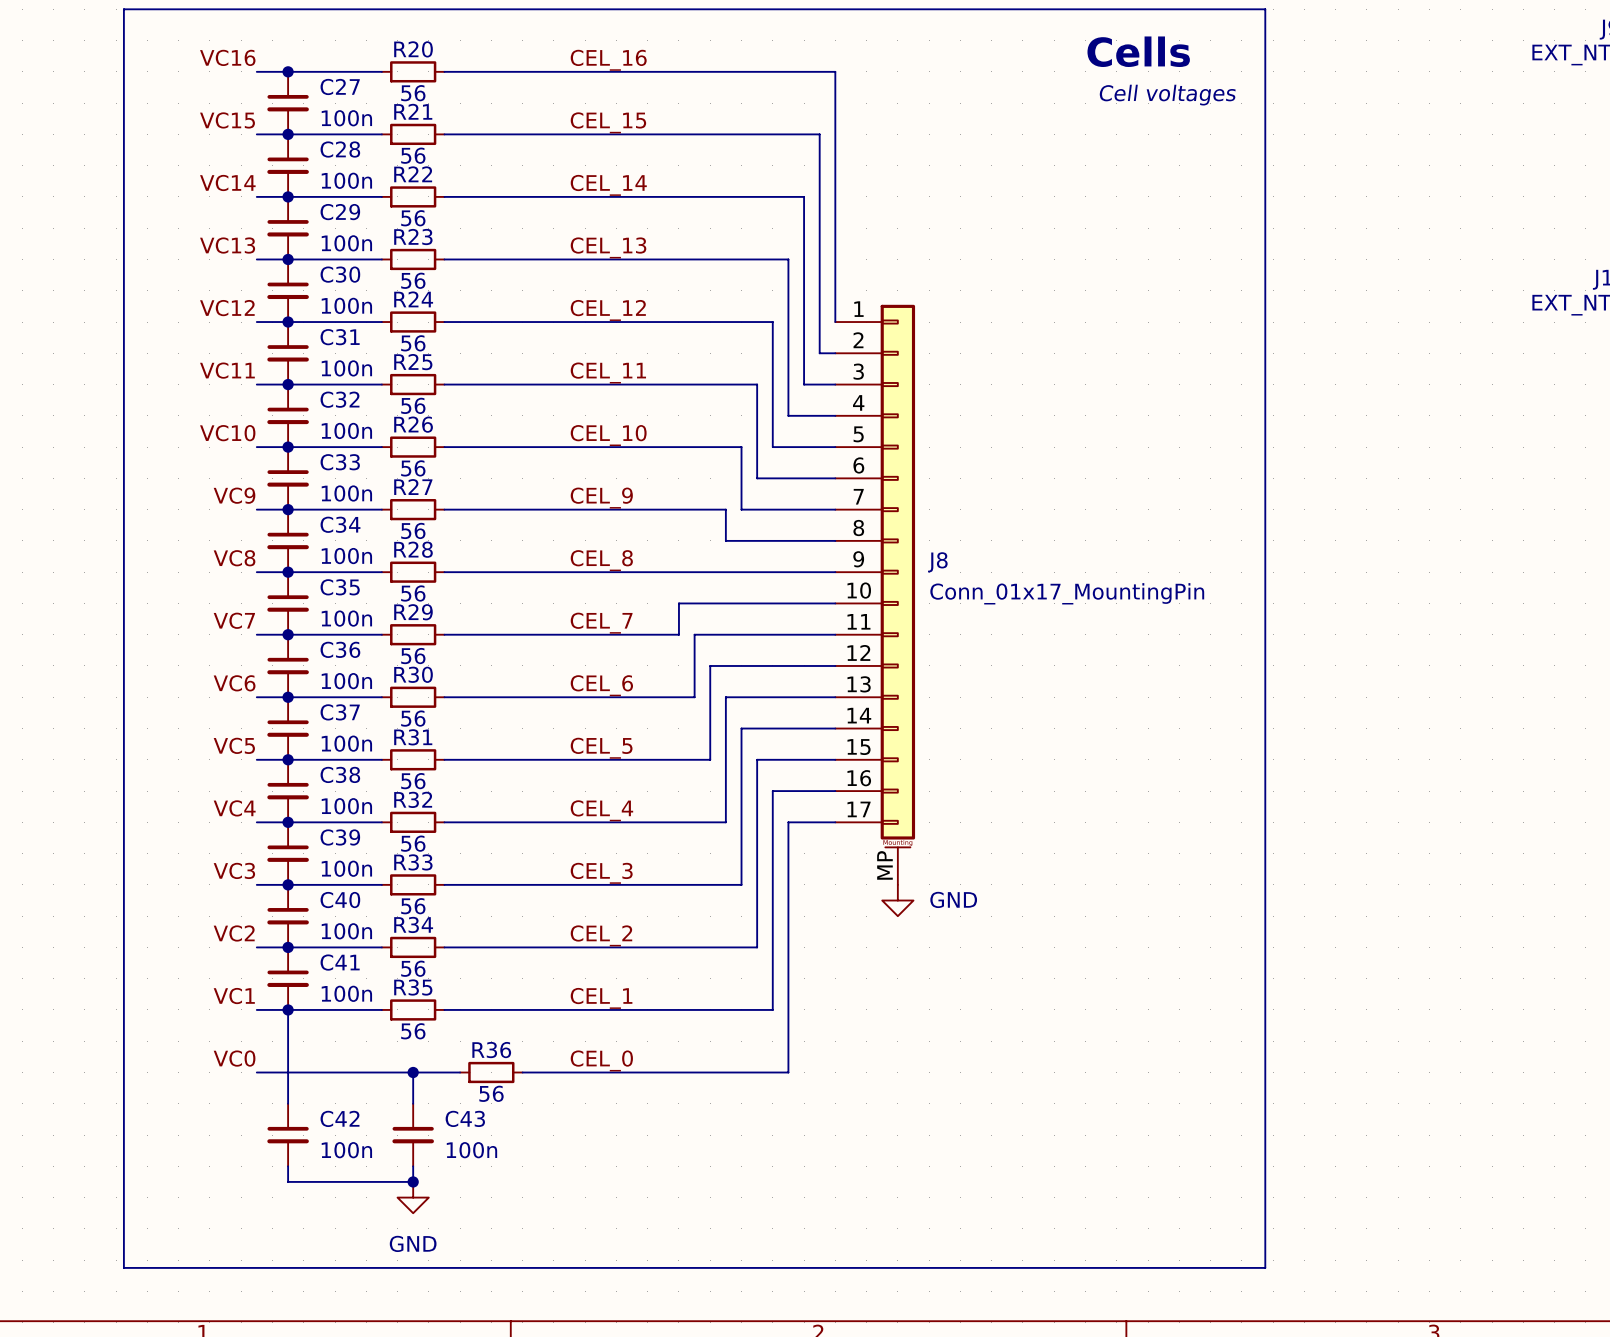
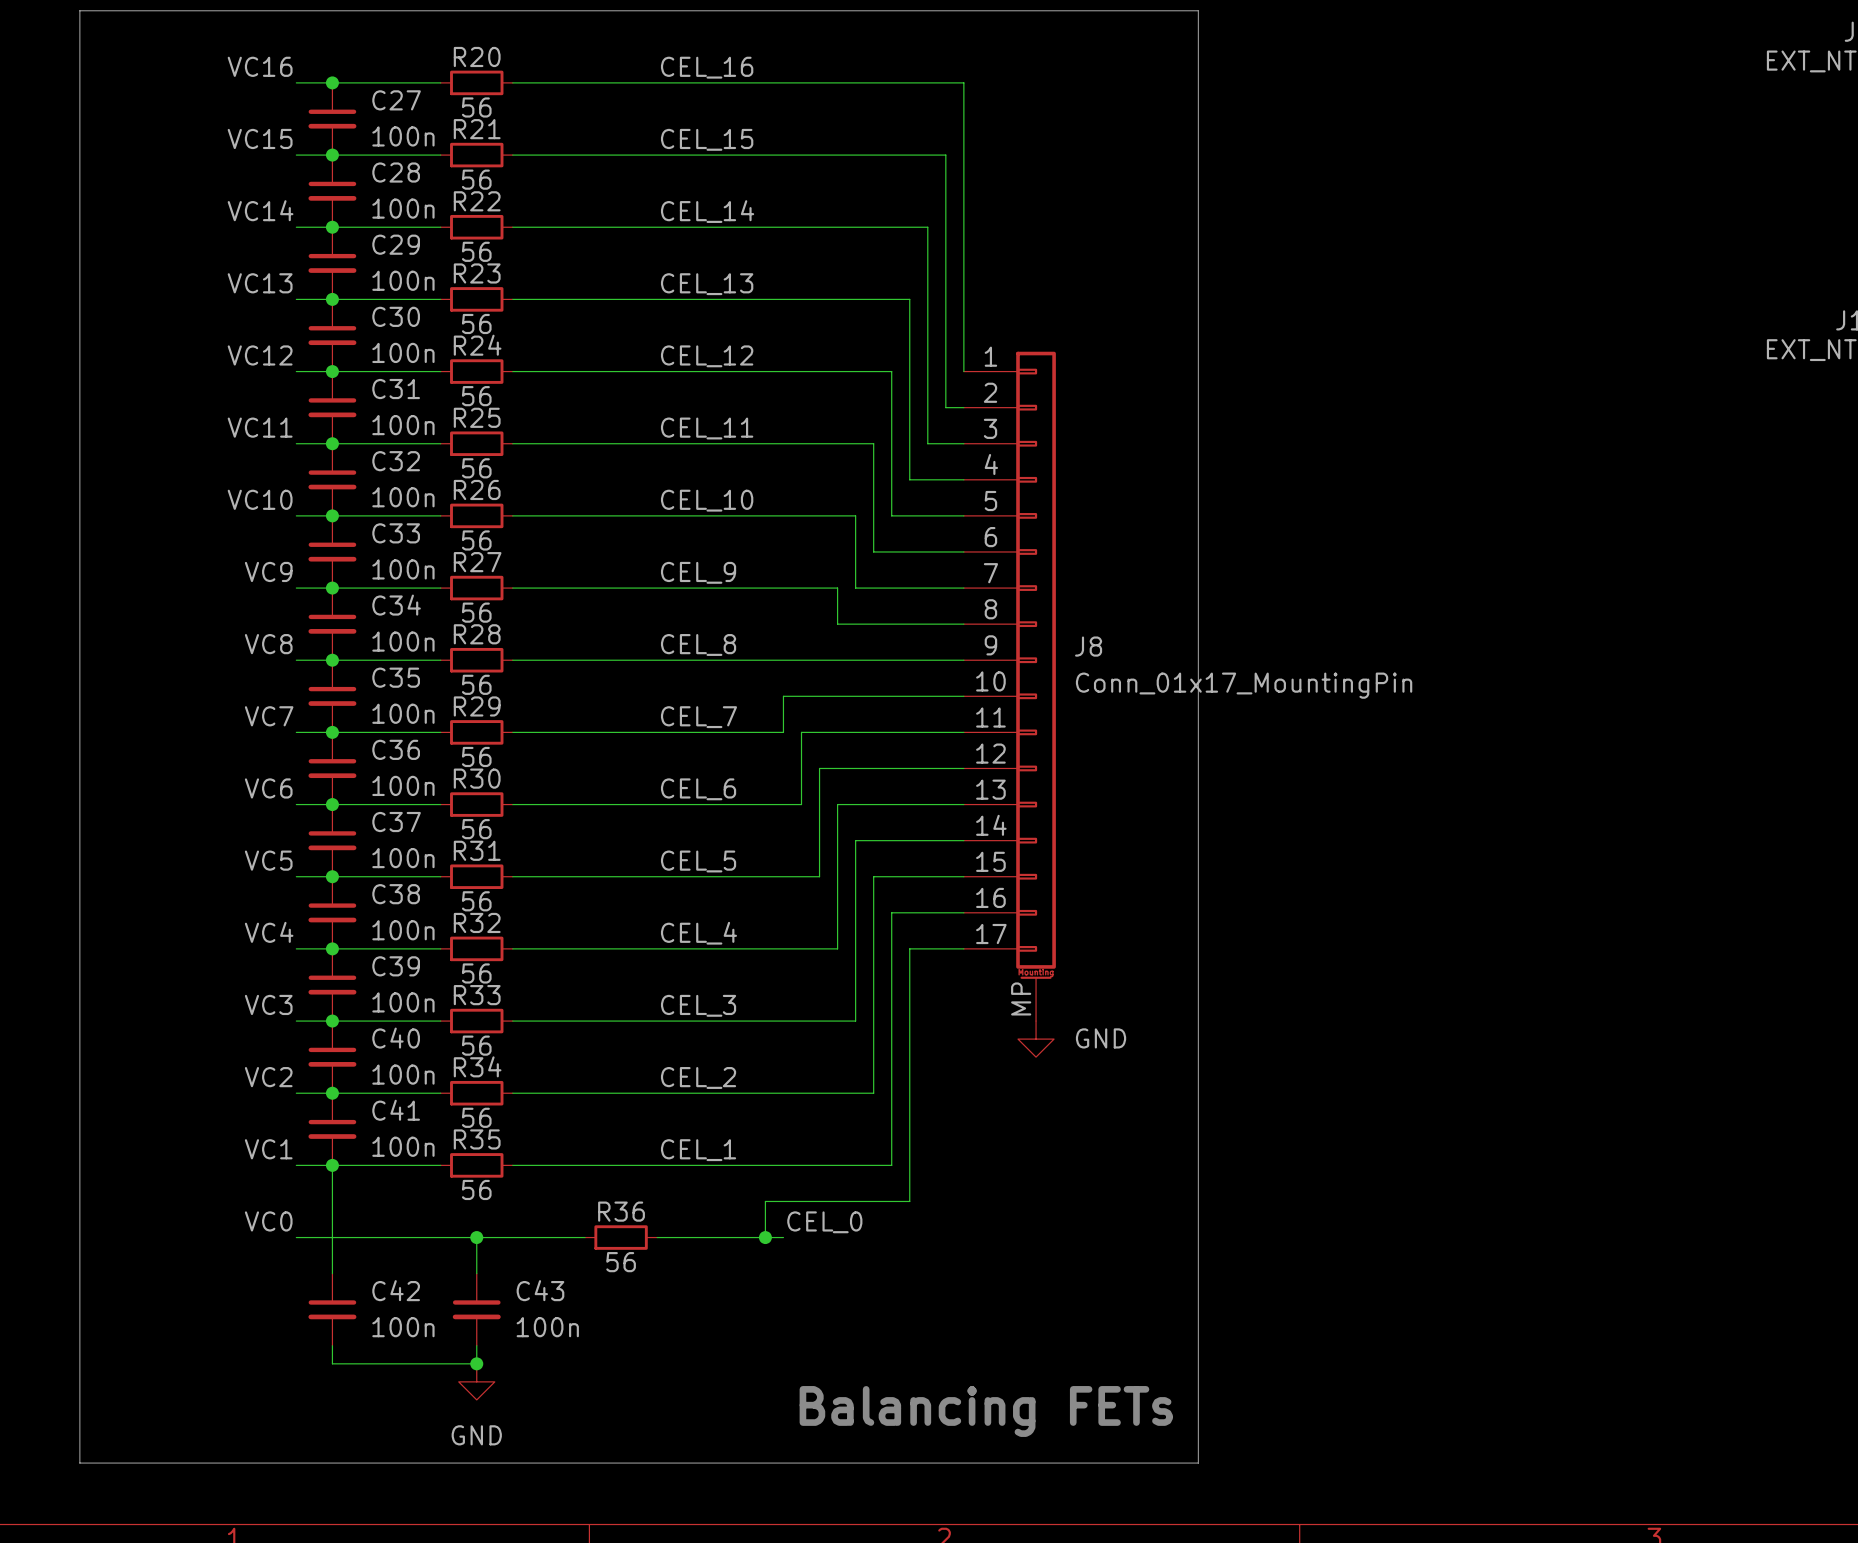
line: (123, 9) (123, 1267) -> (142, 10) (79, 10) (79, 1463) (142, 1463)
line: (1038, 9) (1265, 9) (1265, 1267) (1038, 1267) -> (1198, 10) (1198, 1463)
text: Cells (1138, 51) -> none
text: Cell voltages (1167, 95) -> none
wire: (788, 1041) (788, 1072) (678, 1072) -> (909, 1201) (765, 1201) (765, 1237)
label position: CEL_0 (601, 1060) -> CEL_0 (824, 1222)
R36 position: (491, 1072) -> (621, 1237)
wire: (522, 1072) (569, 1072) -> (530, 1237) (585, 1237)
junction: none -> (765, 1237)
text: none -> Balancing FETs (986, 1411)

